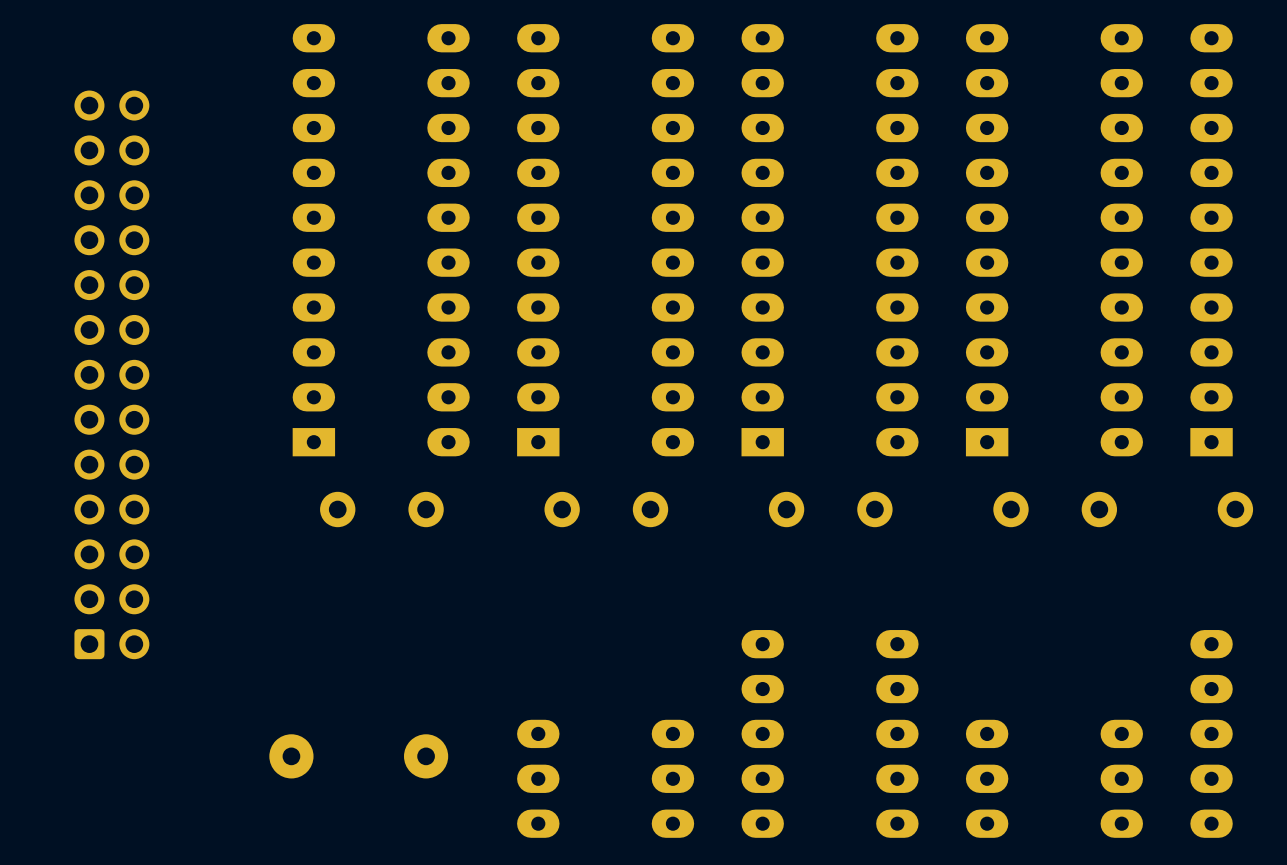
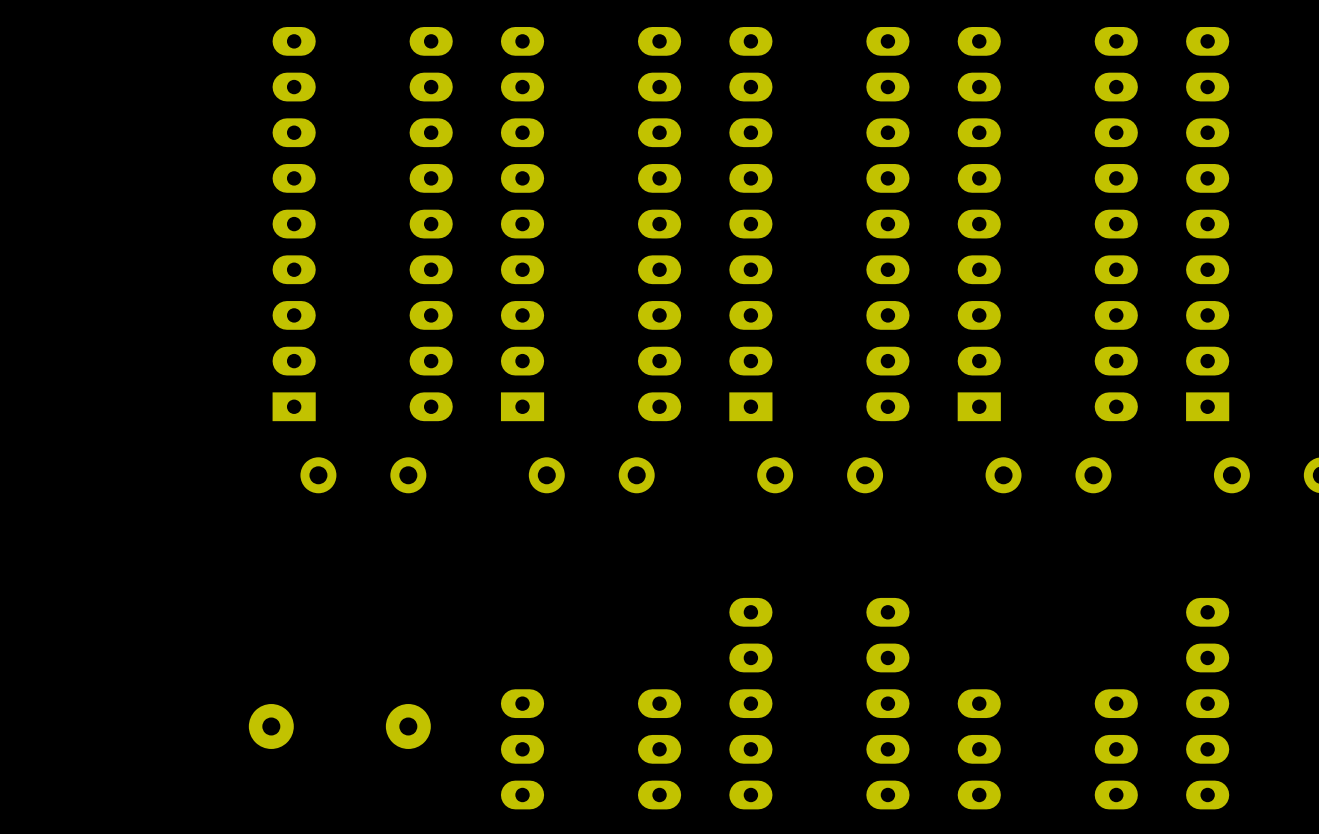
part: (111, 374) -> none

